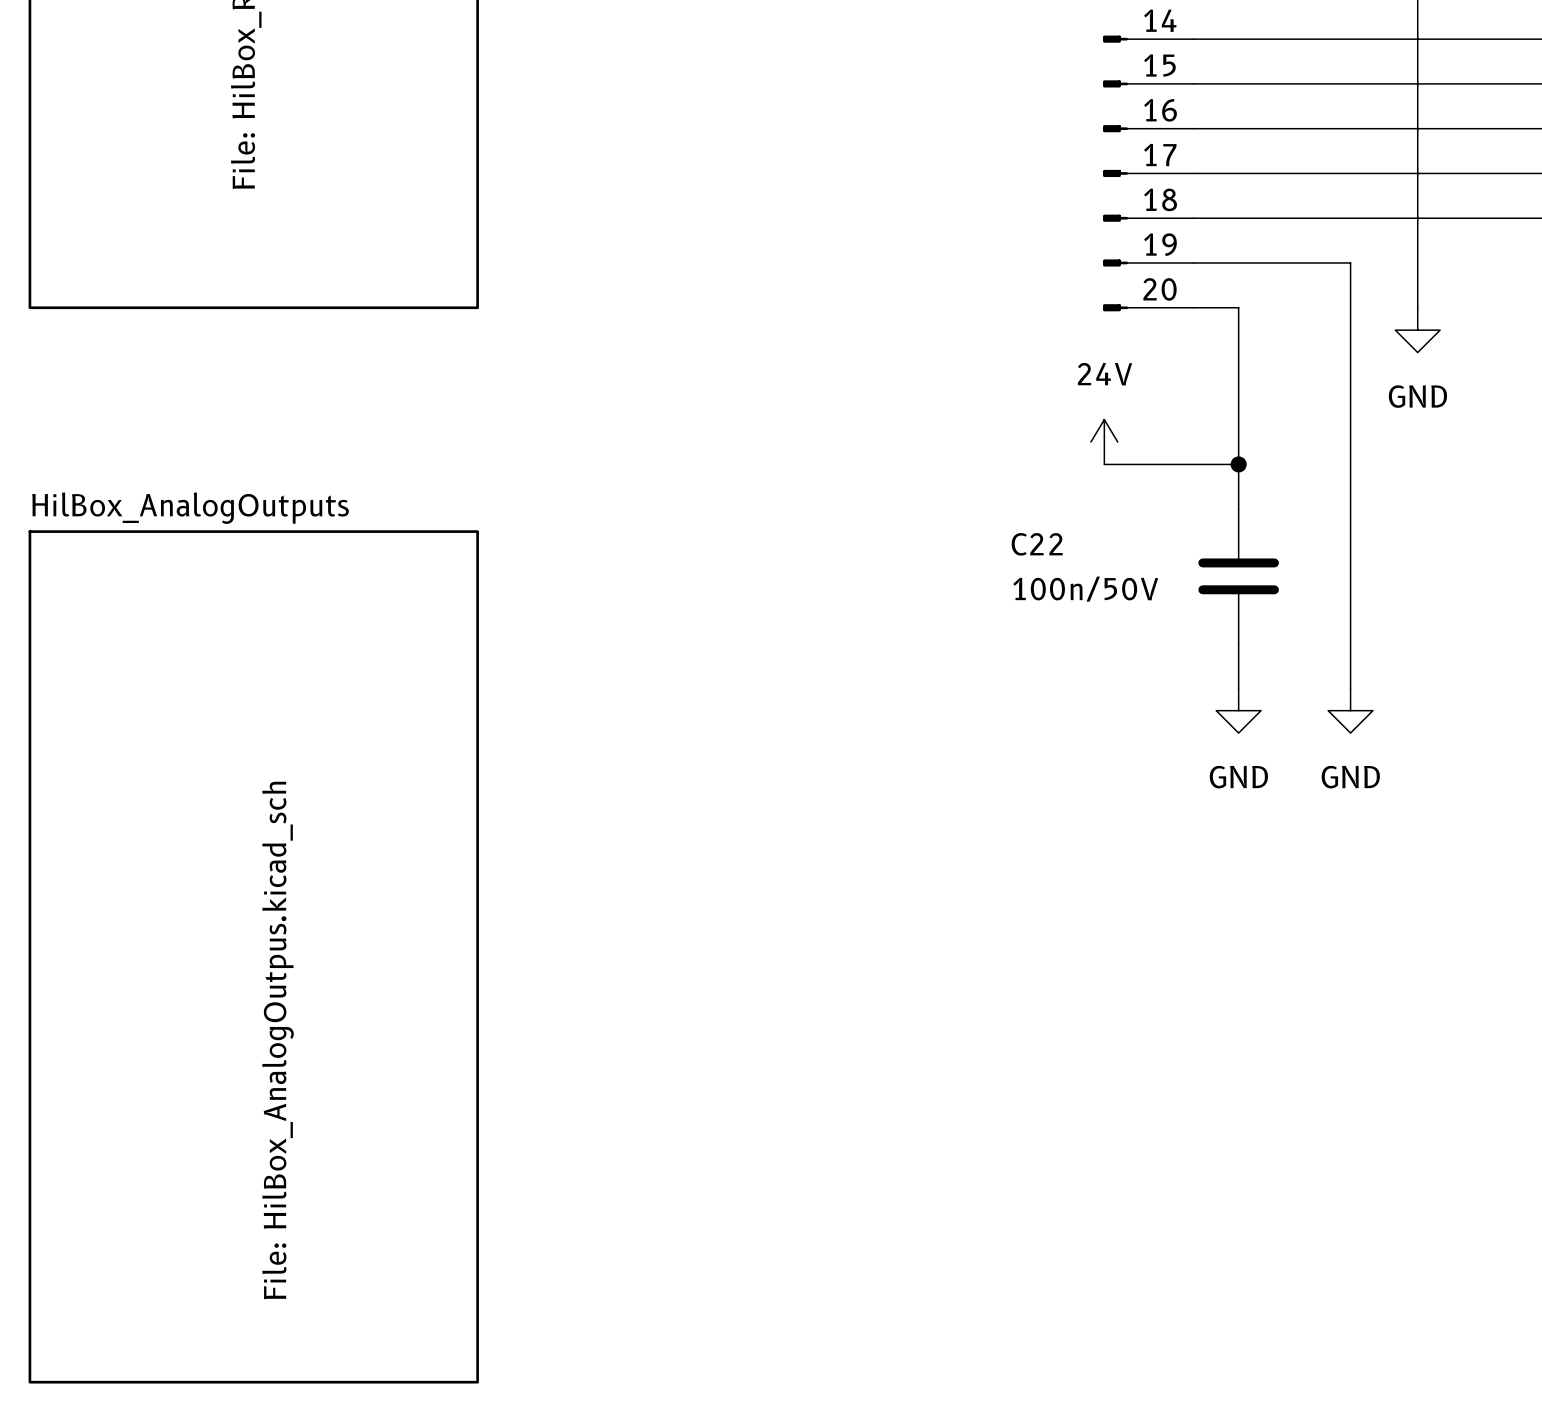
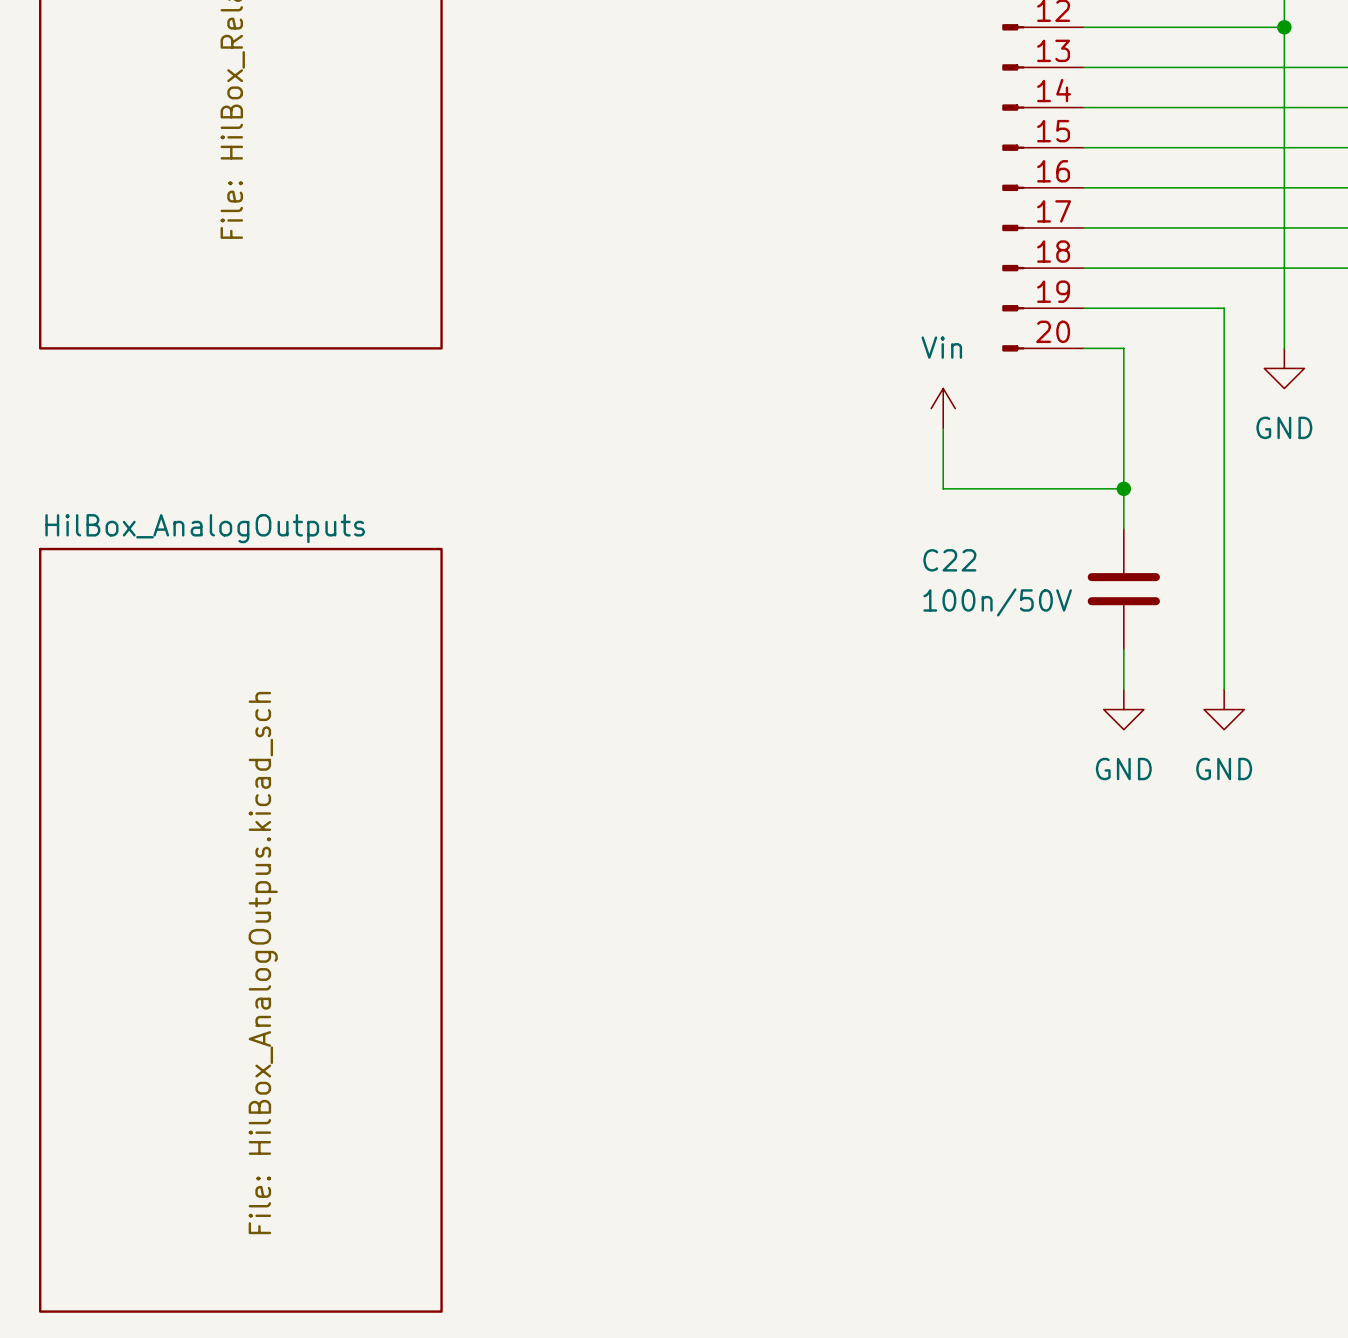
power symbol: none -> Vin (943, 408)
wire: none -> (943, 428) (943, 488) (1003, 488)
power symbol: 24V (1104, 442) -> none

